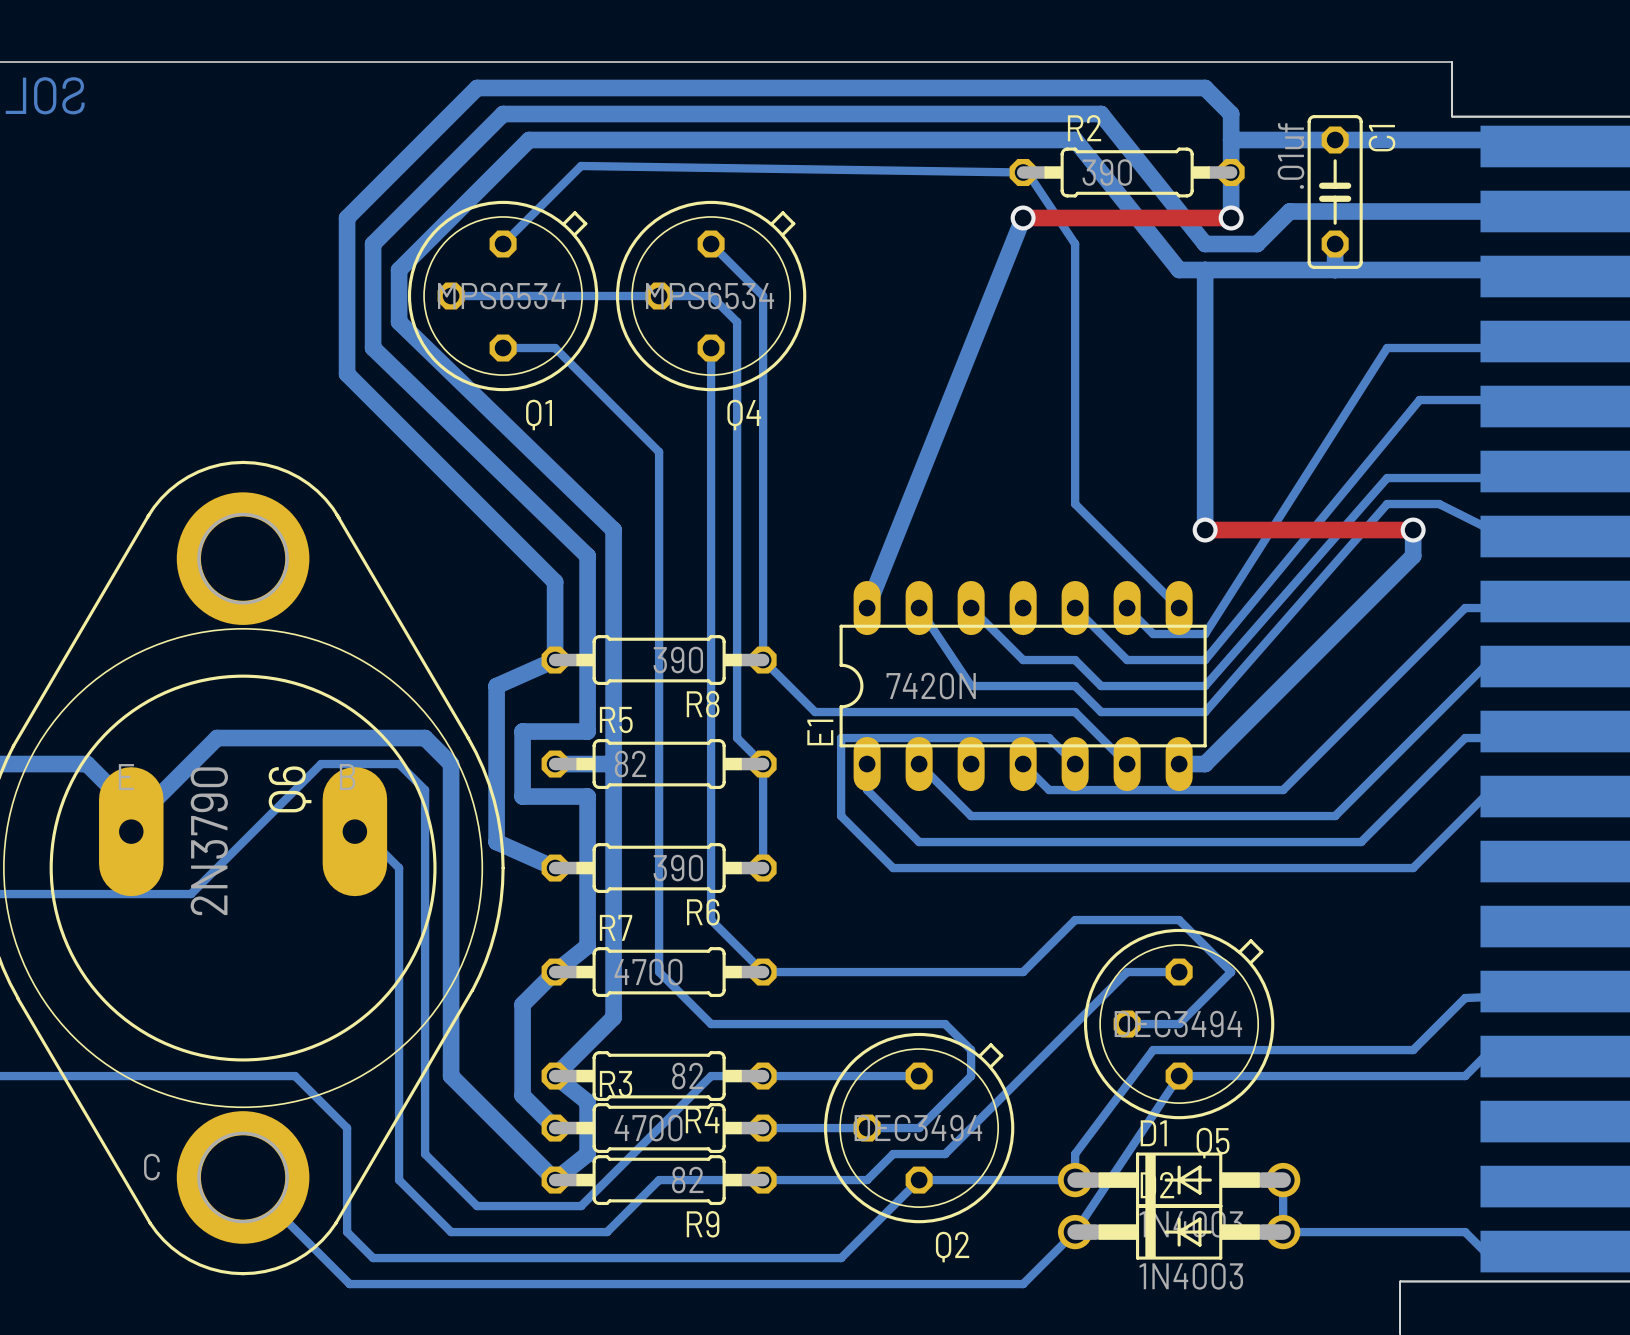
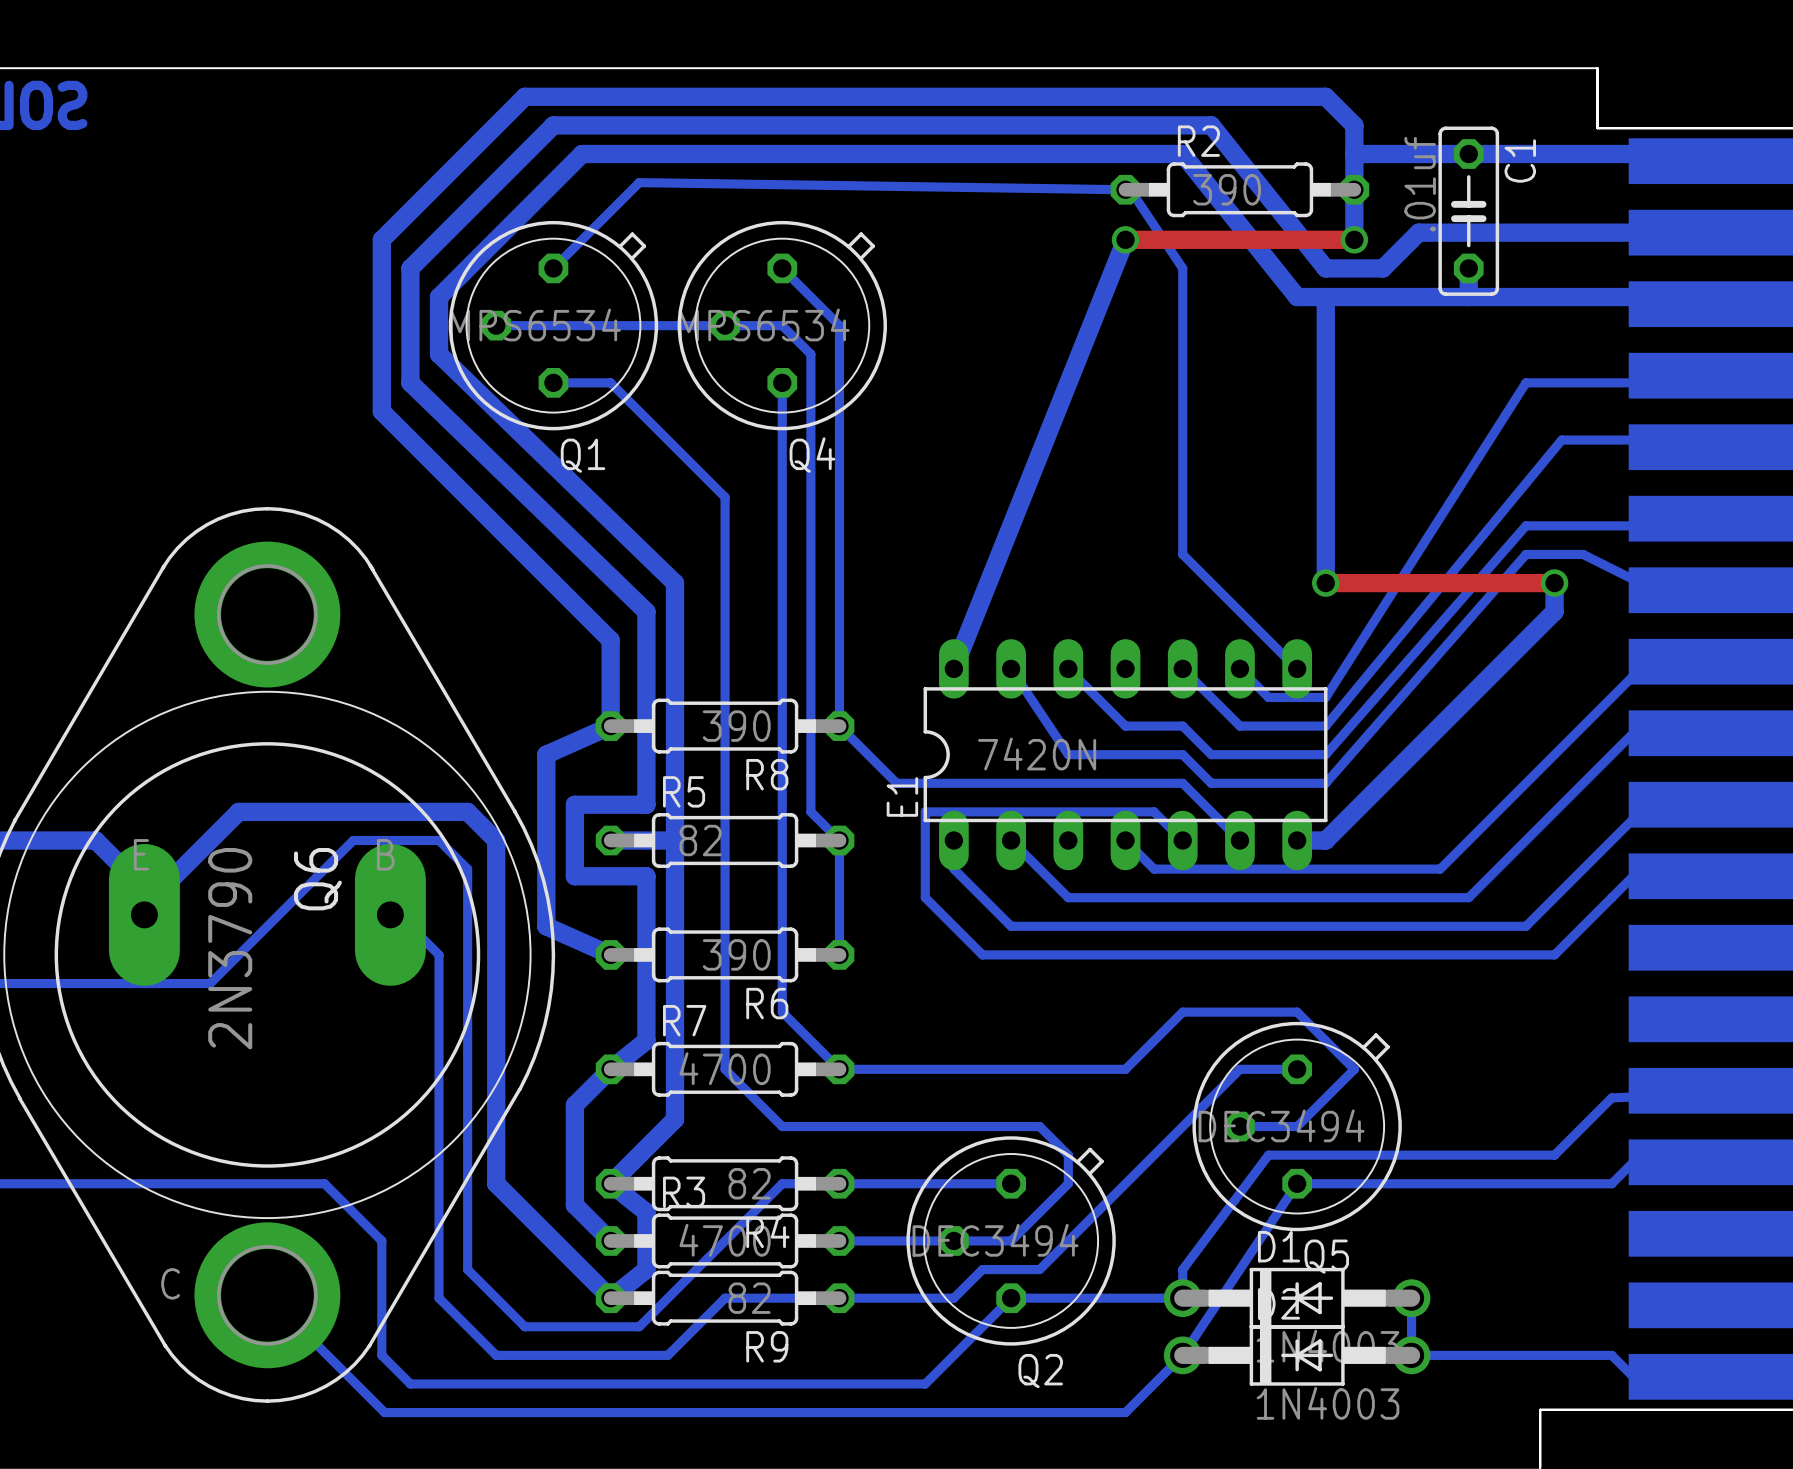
bottom track: (1491, 608) (1465, 608) (1283, 790) -> (1640, 668) (1440, 869) (1411, 869)
bottom track: (1491, 738) (1465, 738) (1361, 842) -> (1640, 811) (1525, 926) (1497, 926)

